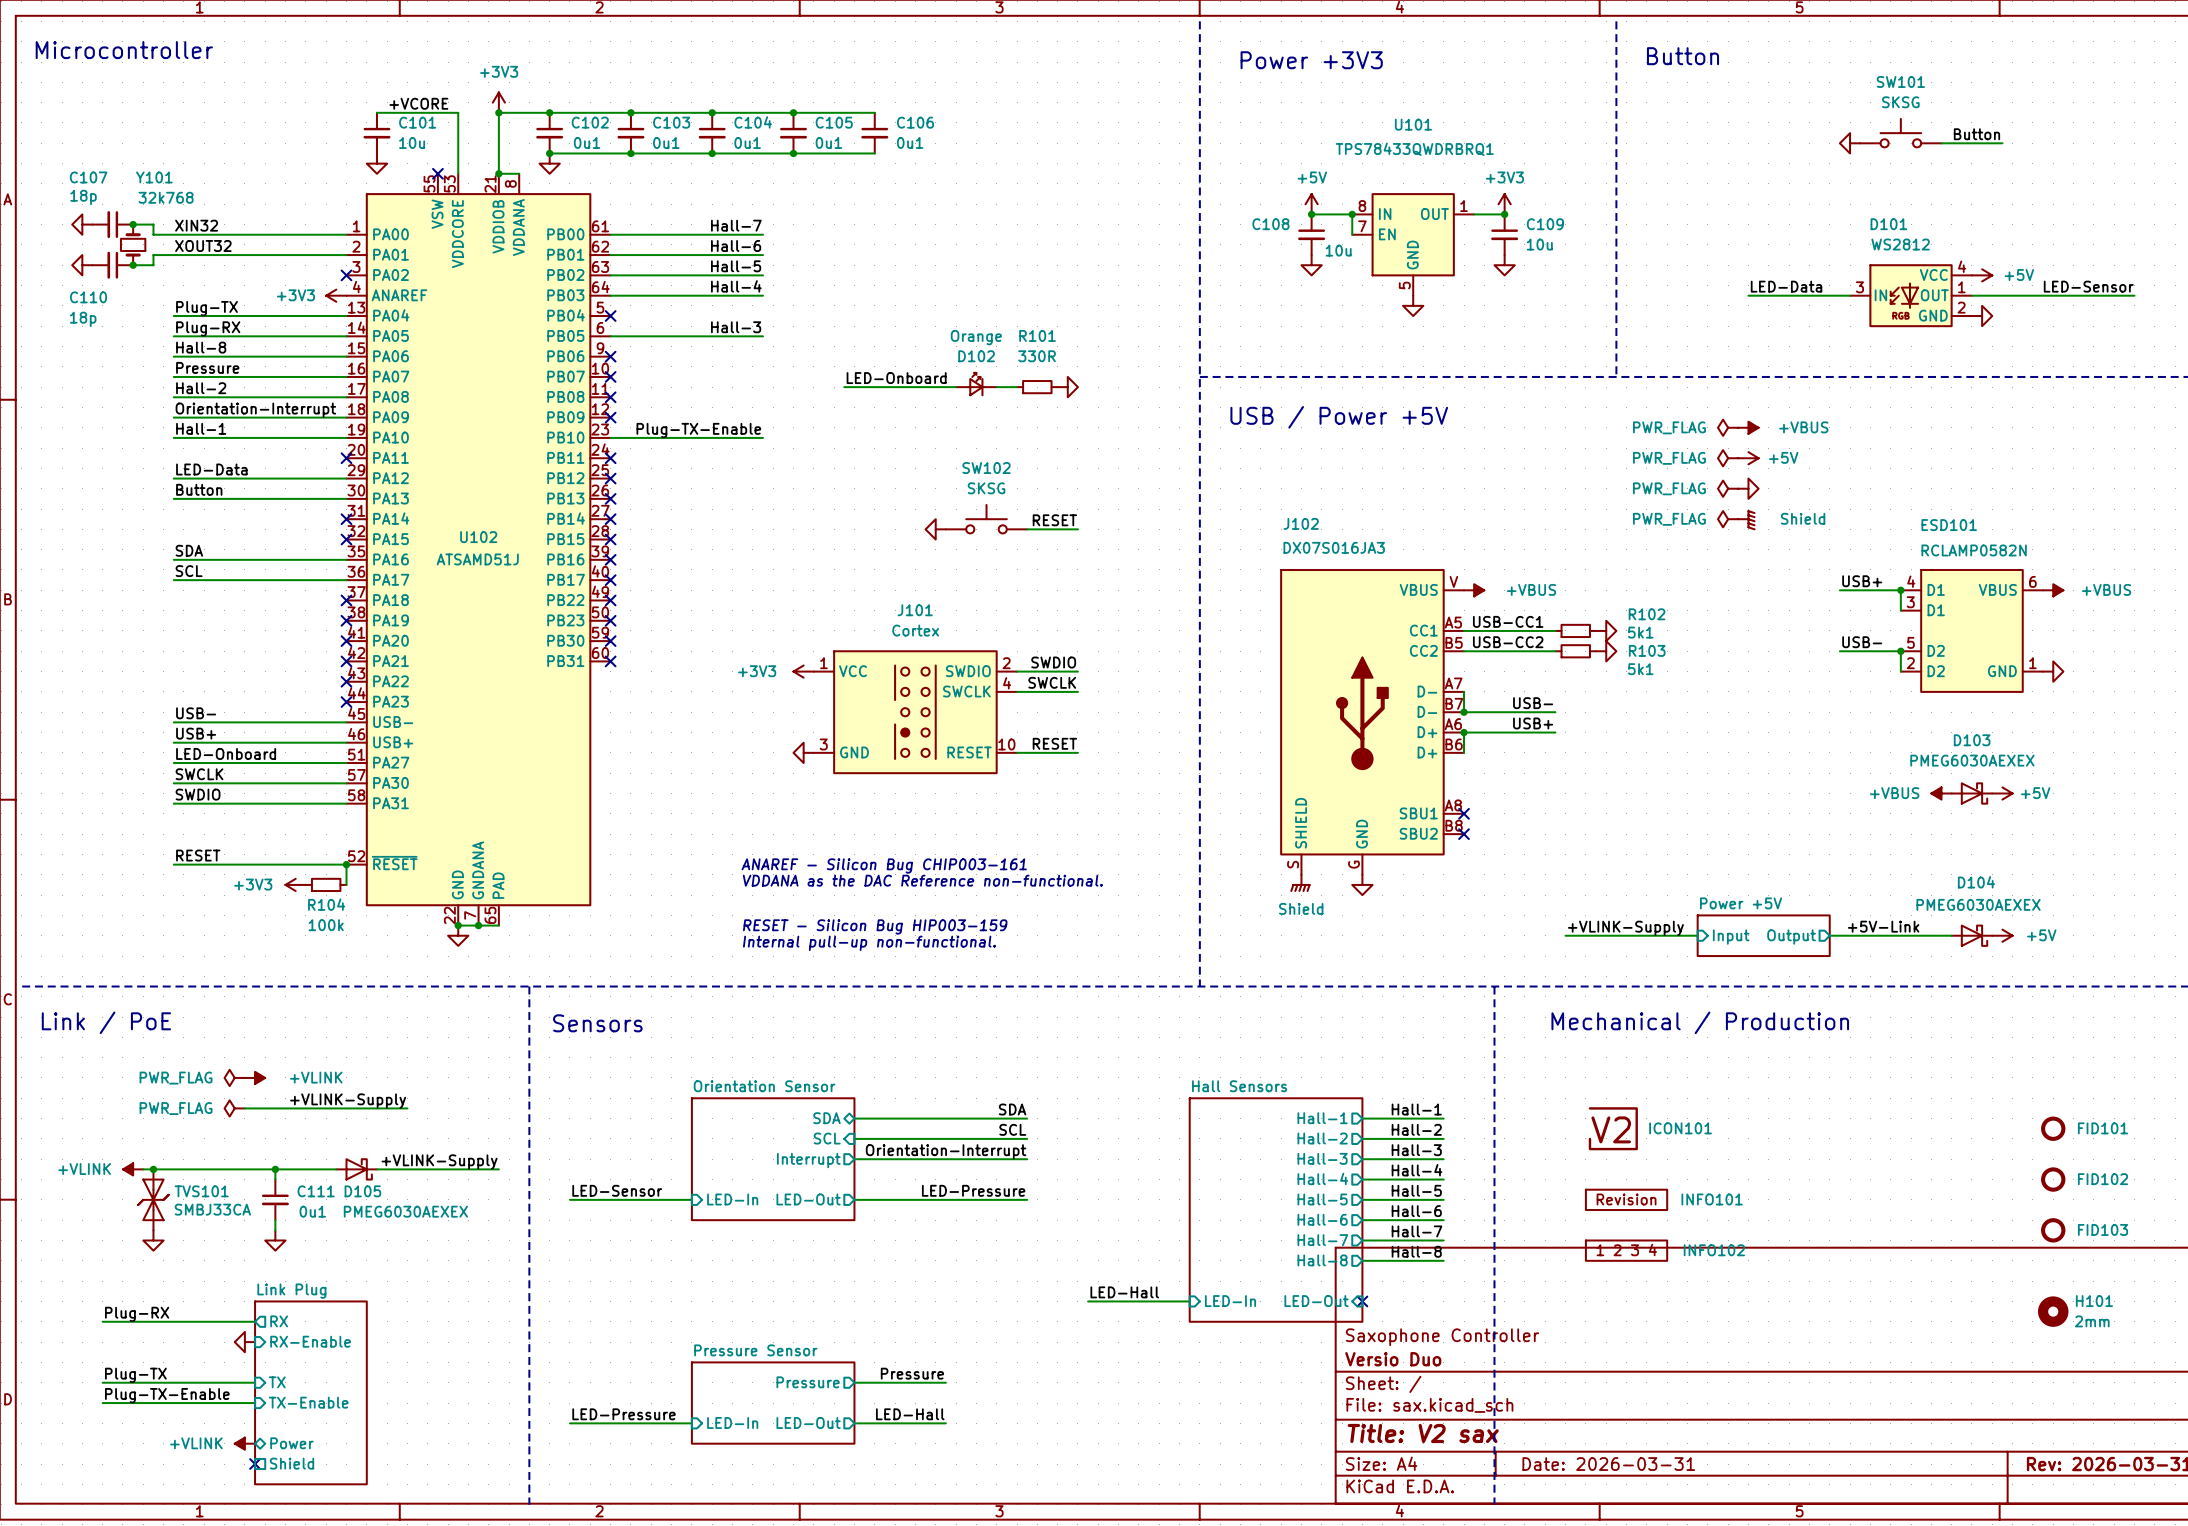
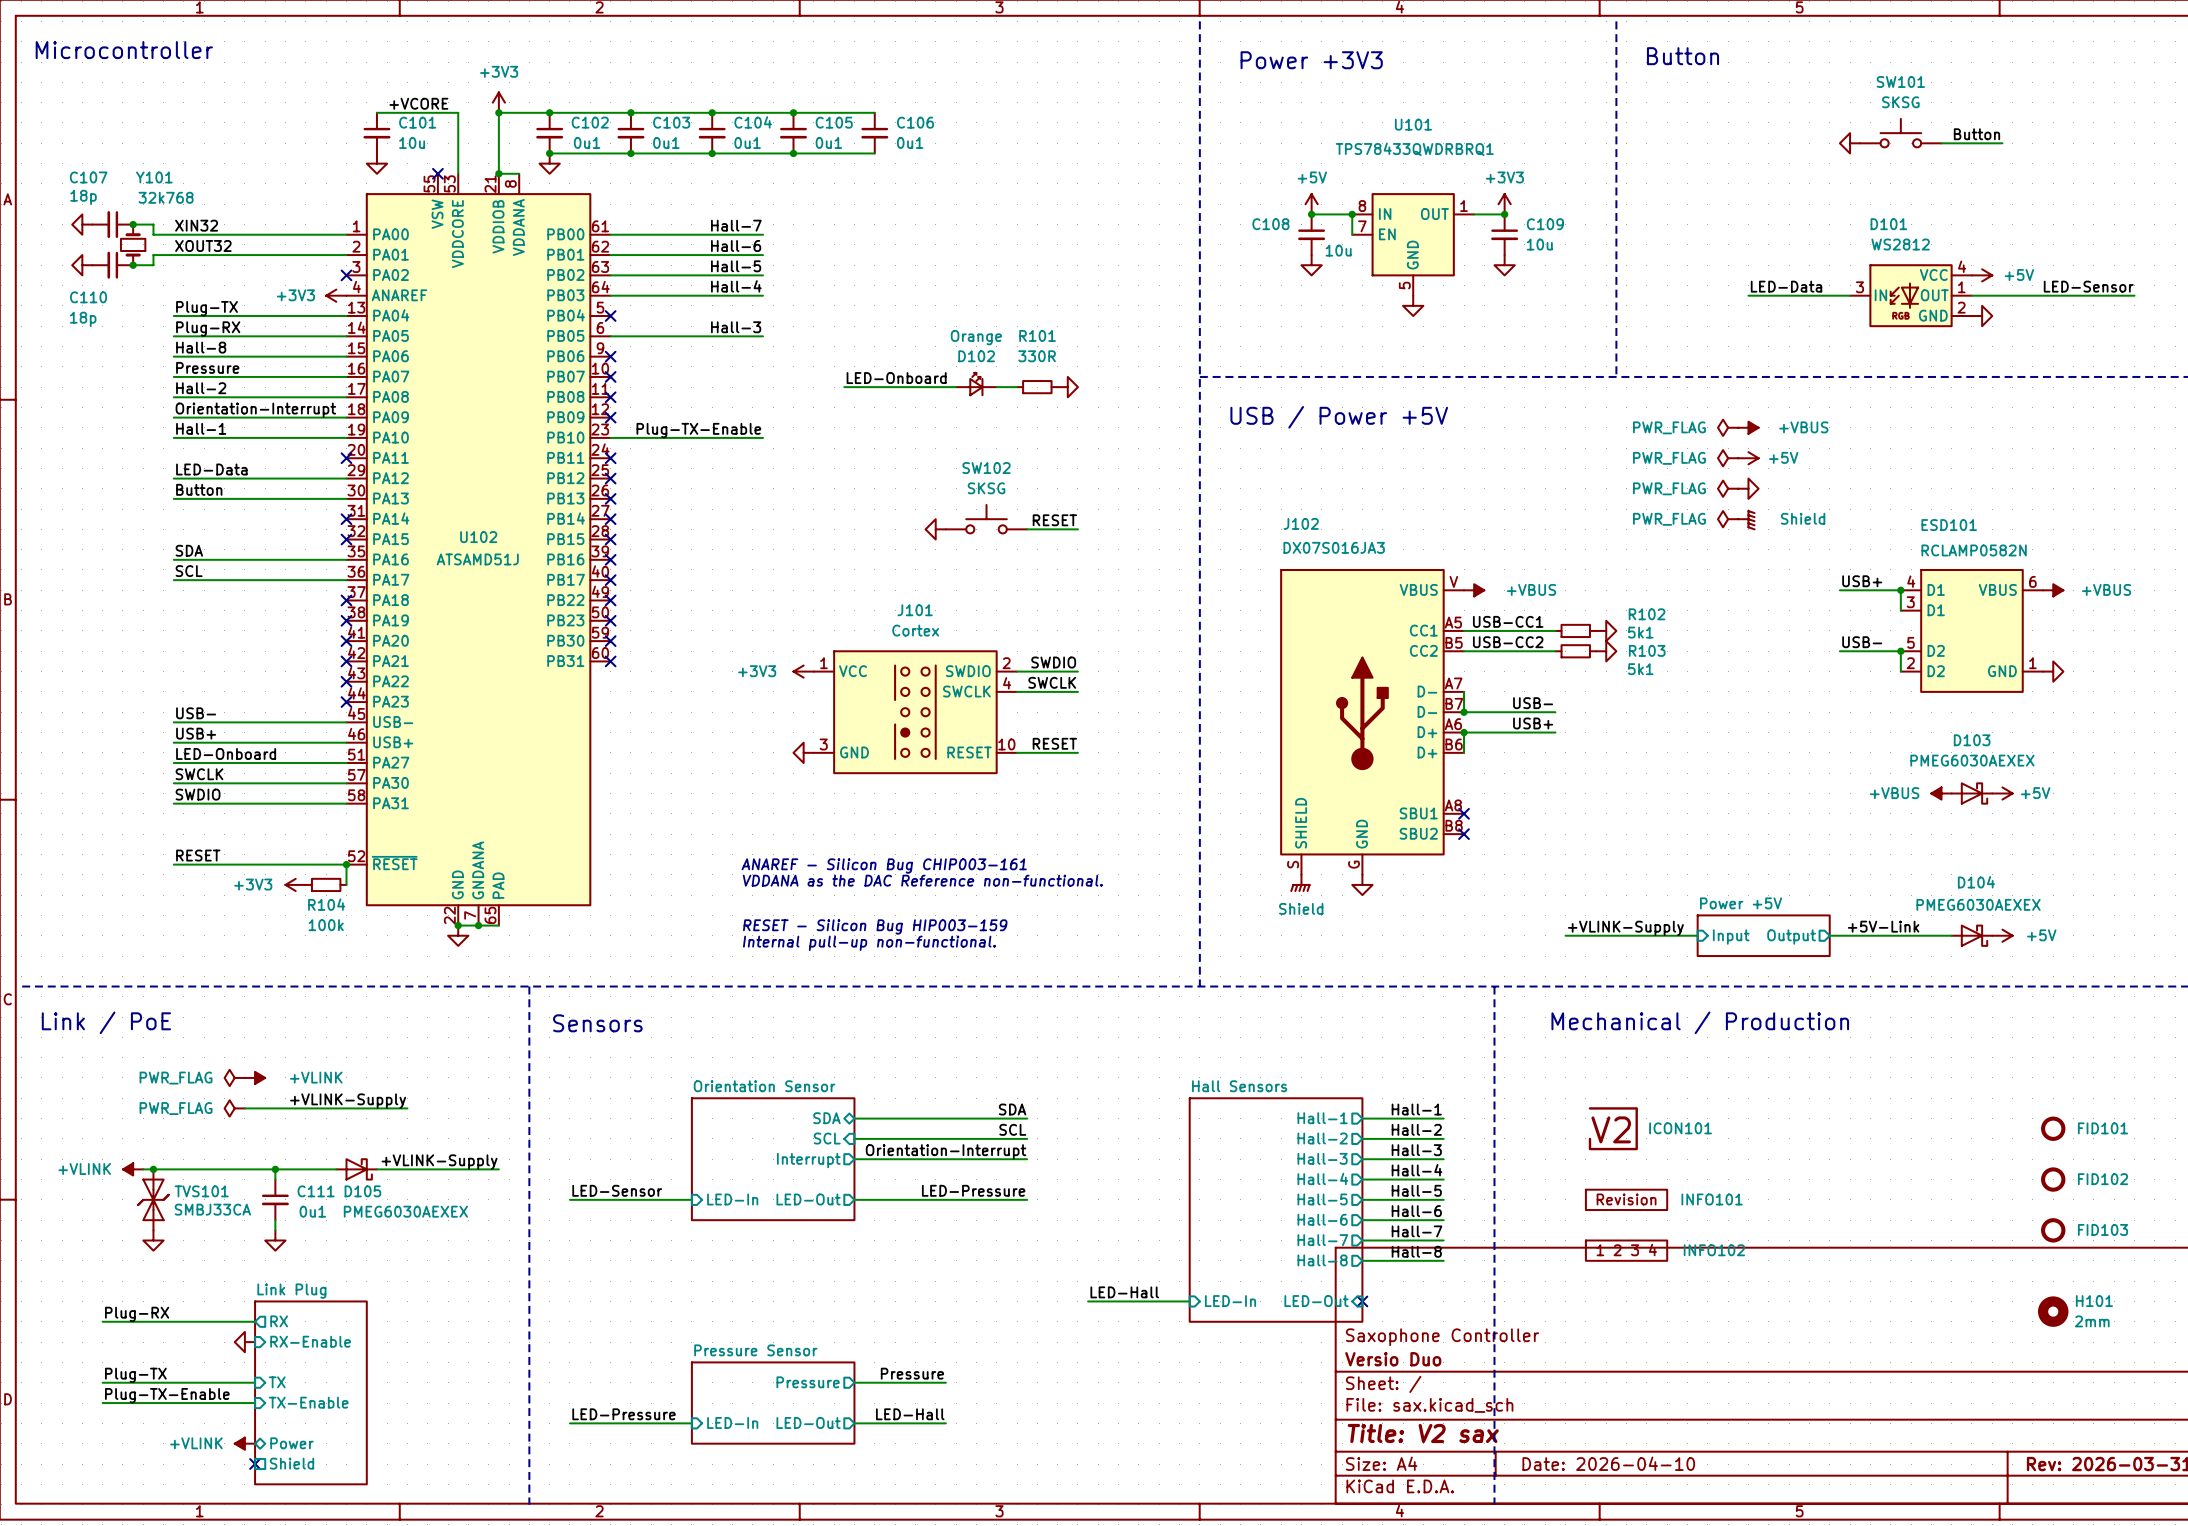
title block: Date: 2026-03-31 (1608, 1464) -> Date: 2026-04-10 (1608, 1463)

